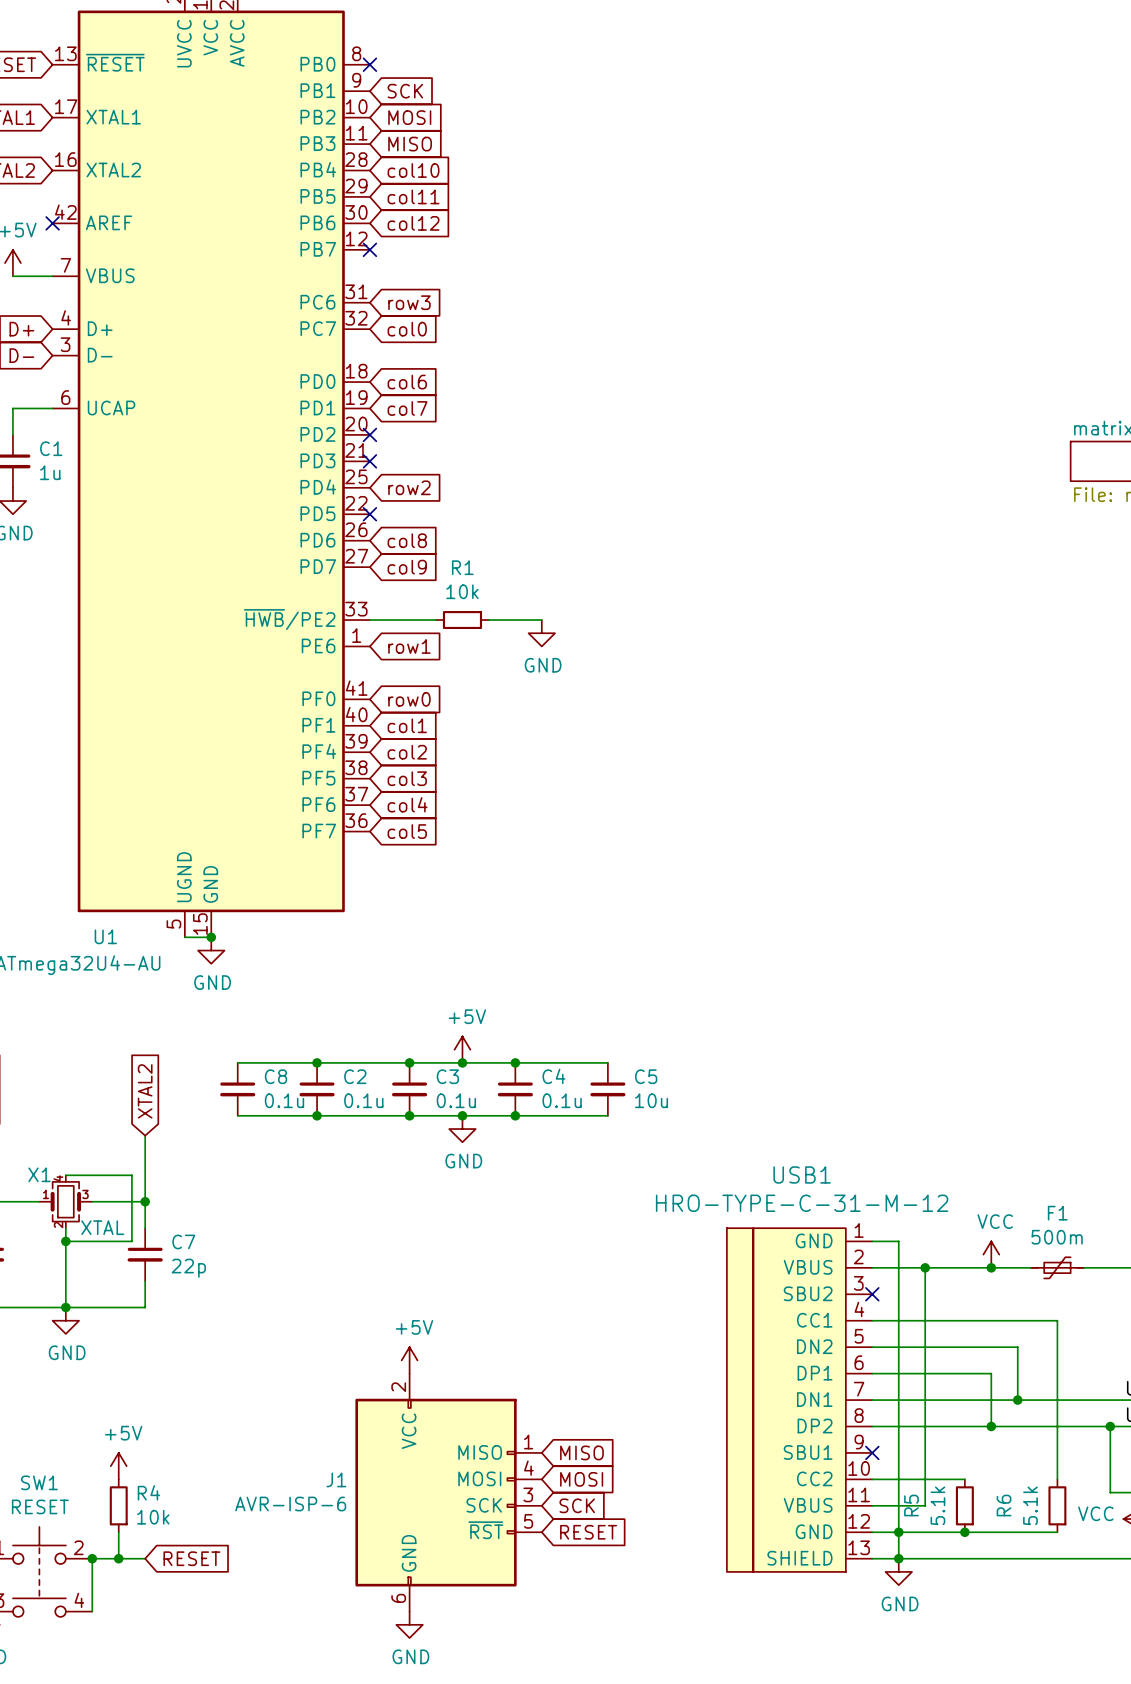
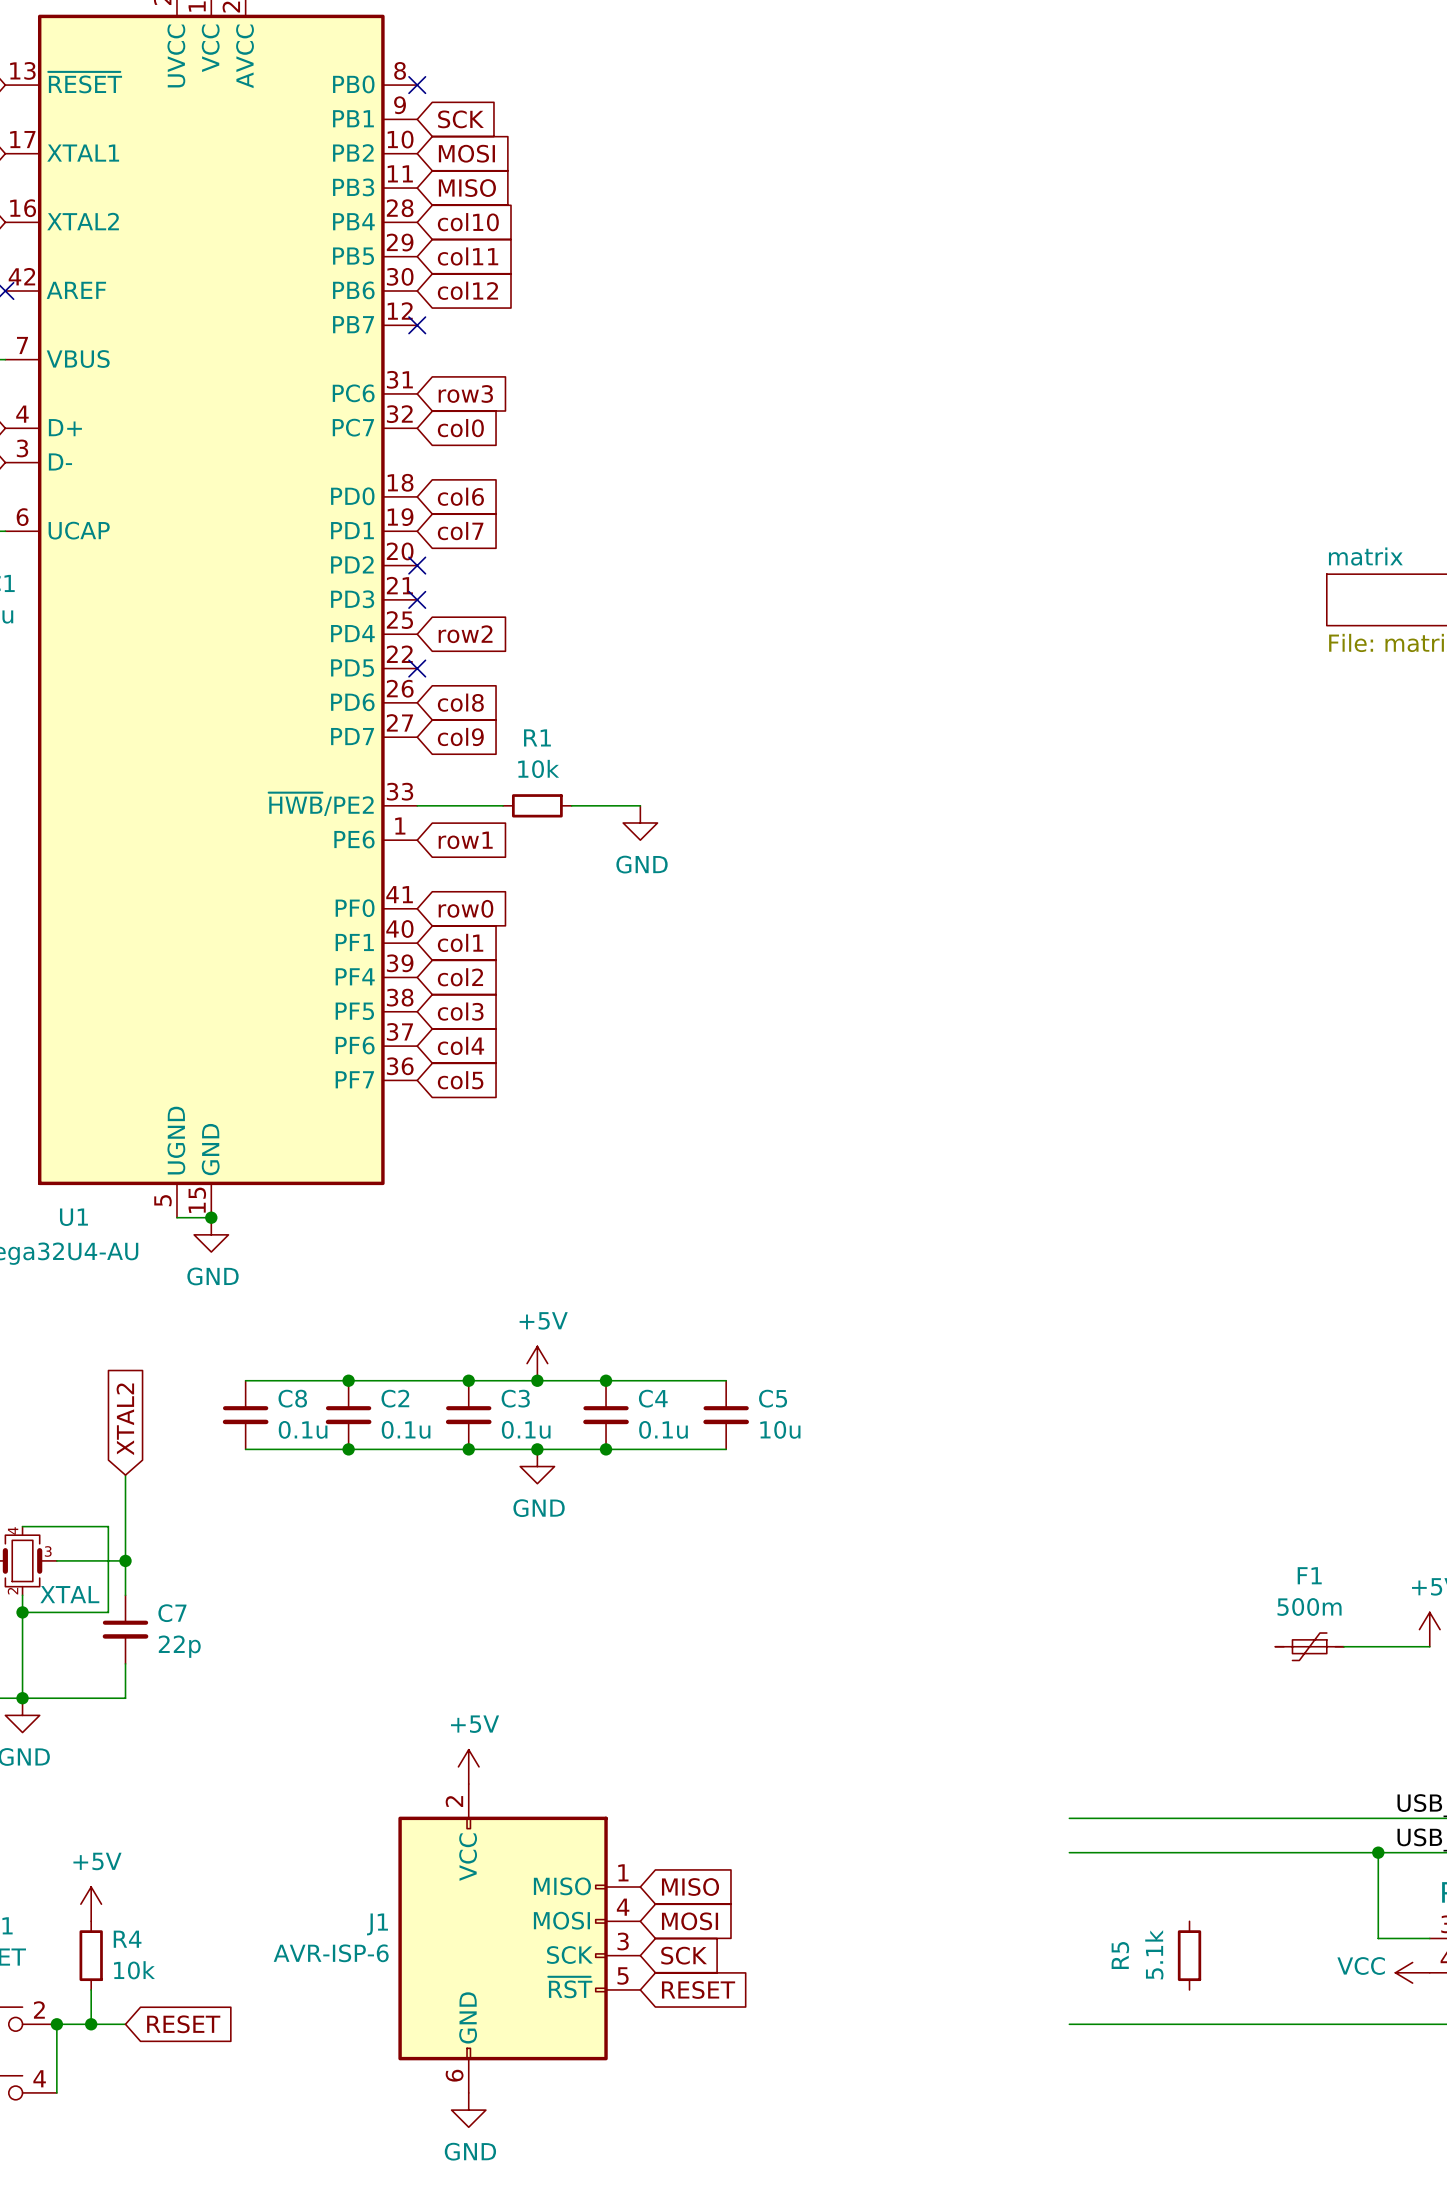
wire: (872, 1241) (898, 1241) (898, 1558) -> none
power symbol: VCC (991, 1254) -> none
wire: (872, 1267) (1030, 1267) -> none
wire: (925, 1267) (925, 1505) (872, 1505) -> none
junction: (925, 1267) -> none
junction: (991, 1267) -> none
no-connect mark: (872, 1294) -> none
wire: (872, 1320) (1057, 1320) (1057, 1479) -> none
wire: (872, 1347) (1017, 1347) (1017, 1400) -> none
wire: (872, 1373) (991, 1373) (991, 1426) -> none
USB1: HRO-TYPE-C-31-M-12 (799, 1400) -> none
junction: (1017, 1400) -> none
junction: (991, 1426) -> none
no-connect mark: (872, 1452) -> none
wire: (872, 1479) (964, 1479) -> none
R6: 5.1k (1057, 1505) -> none
wire: (872, 1532) (1057, 1532) -> none
junction: (898, 1532) -> none
junction: (964, 1532) -> none
junction: (898, 1558) -> none
power symbol: GND (898, 1571) -> none

